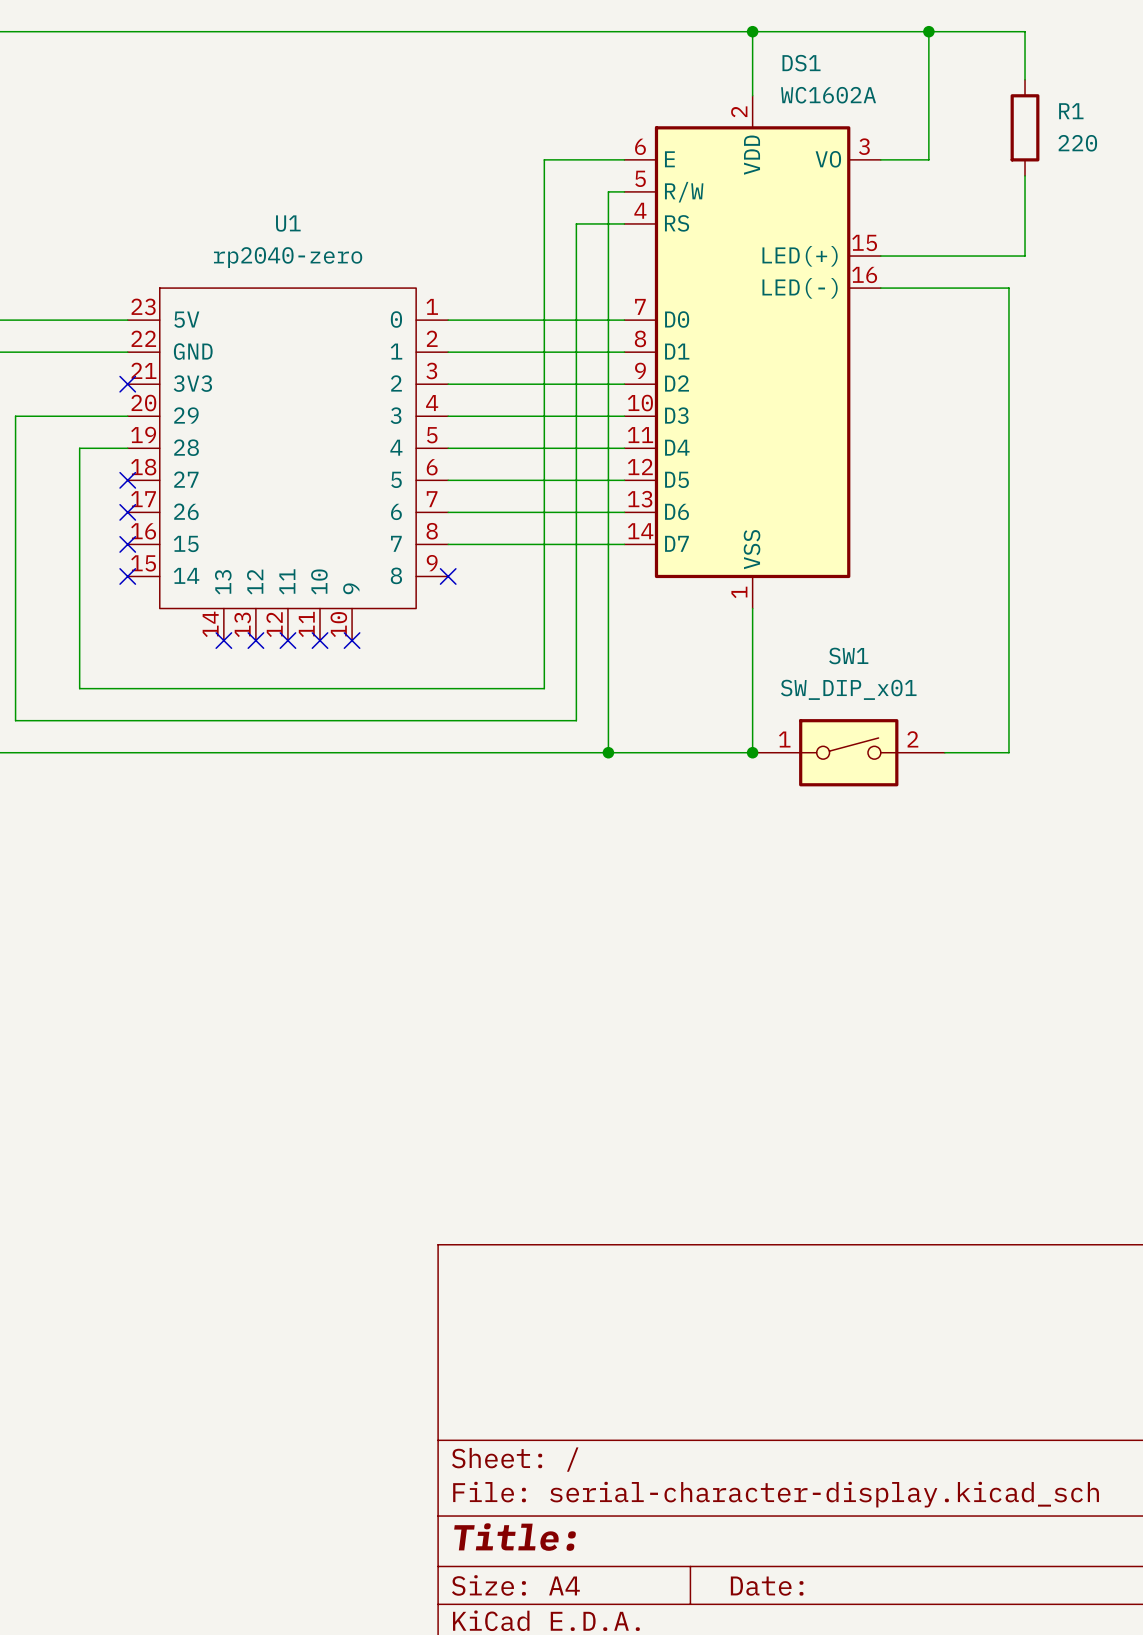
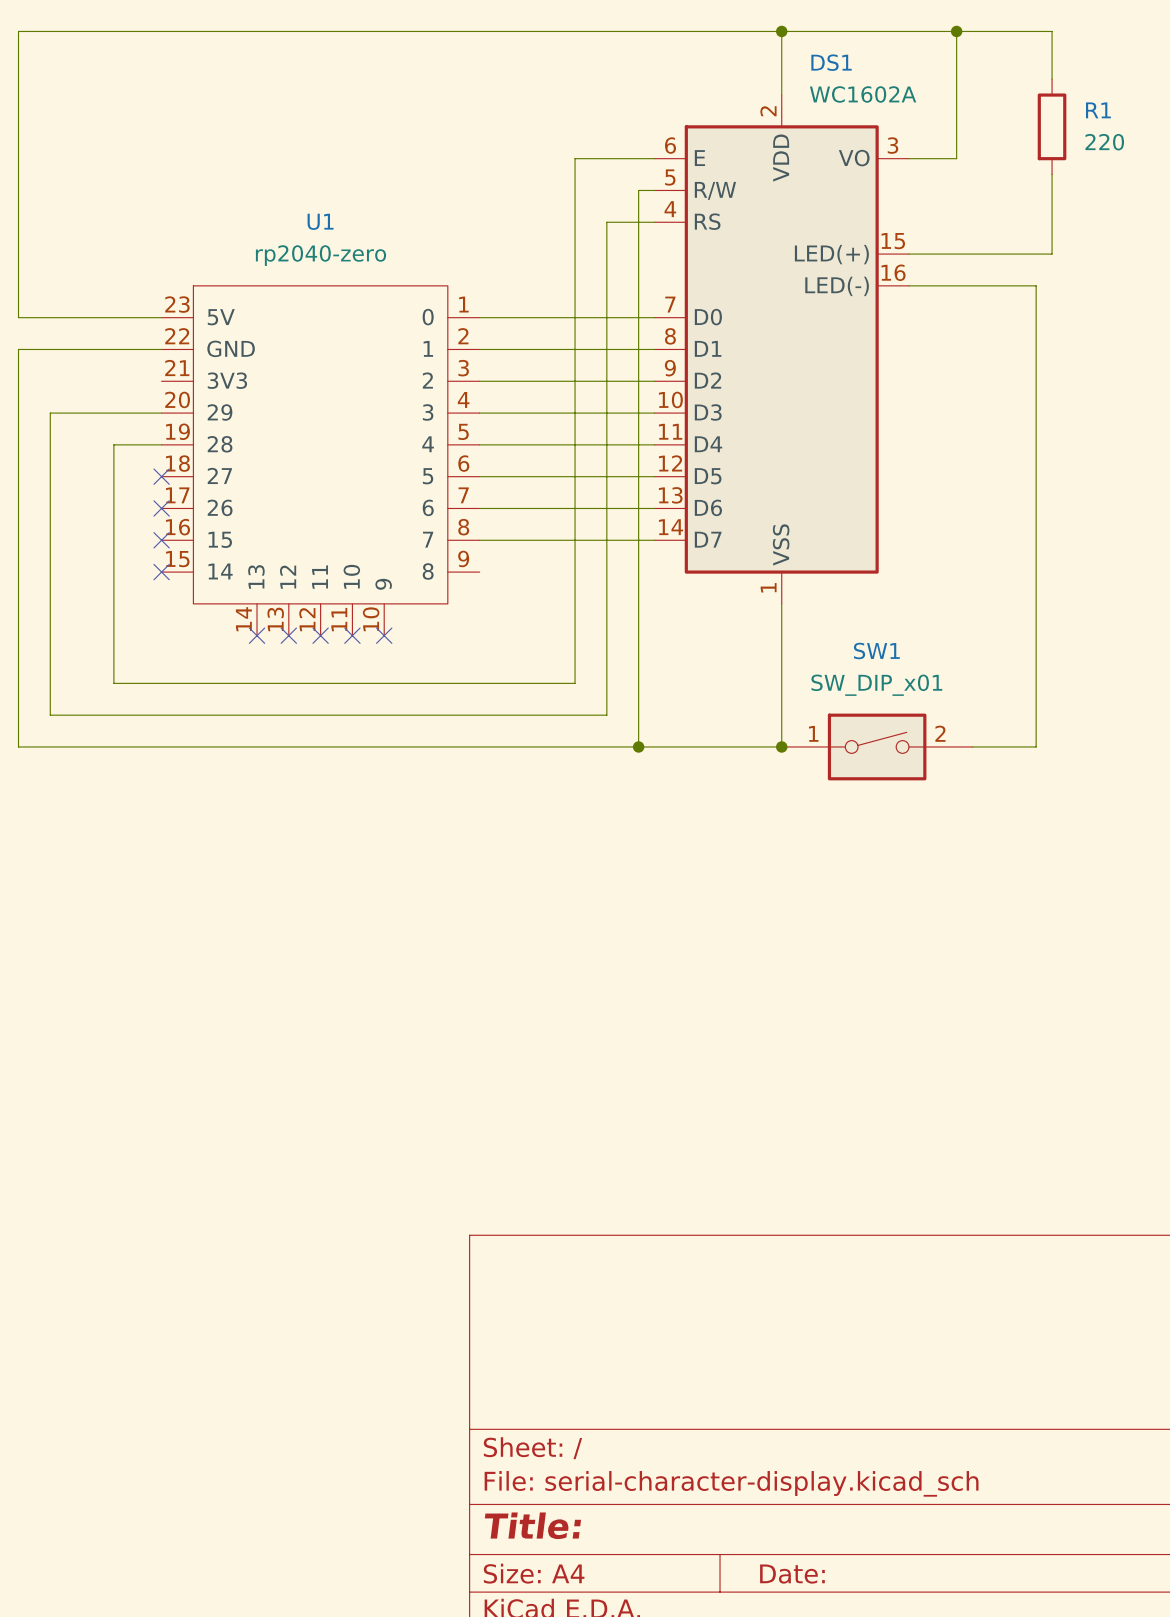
no-connect mark: (127, 384) -> none
no-connect mark: (448, 576) -> none

